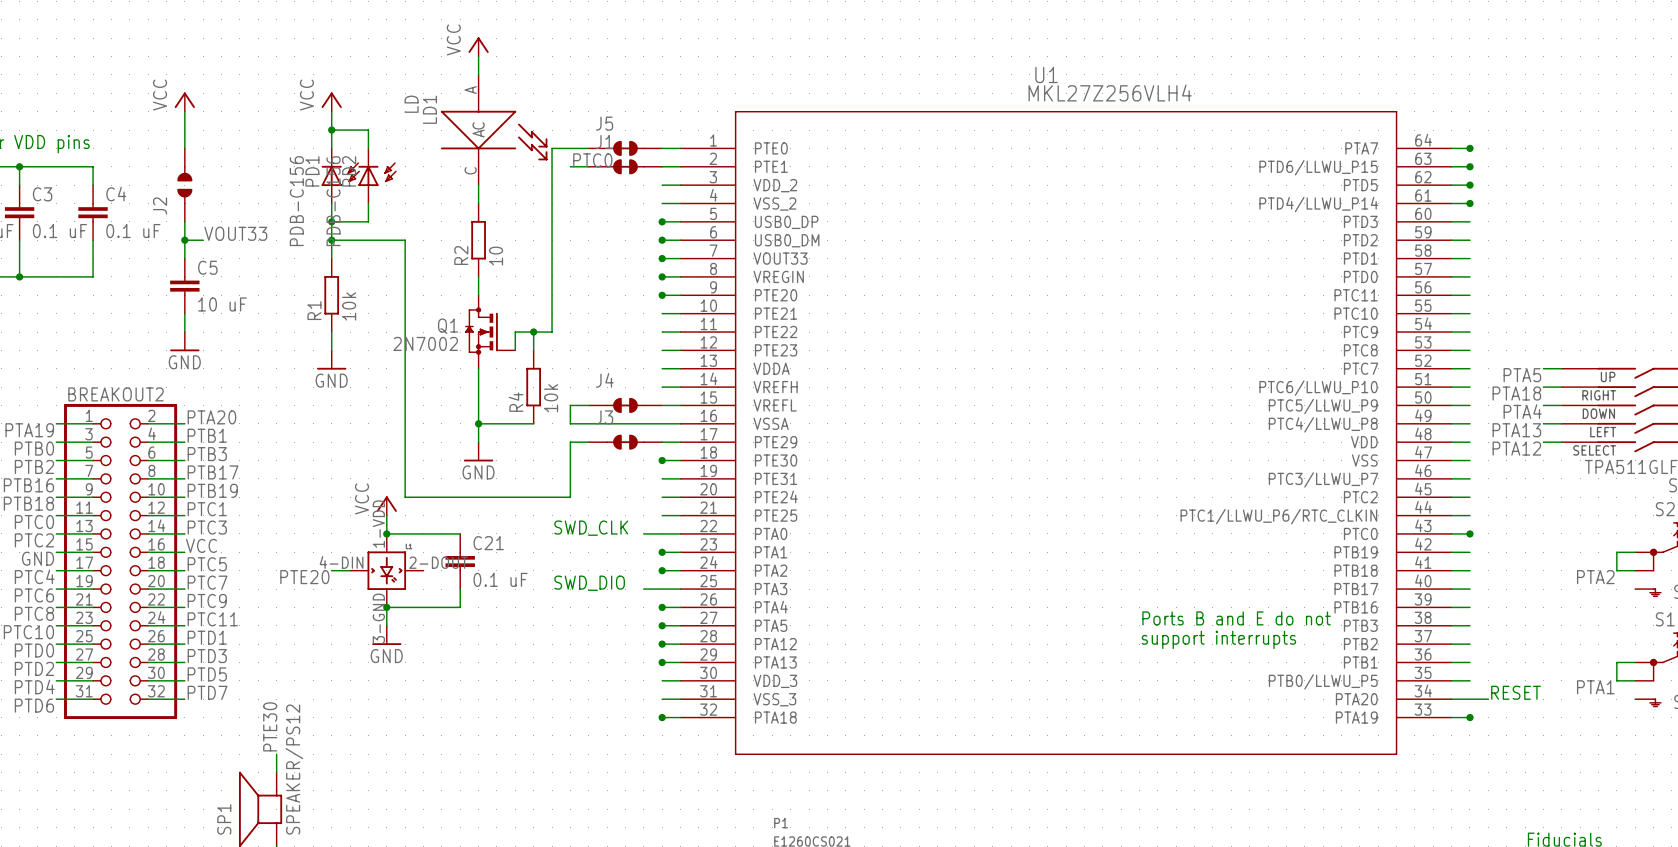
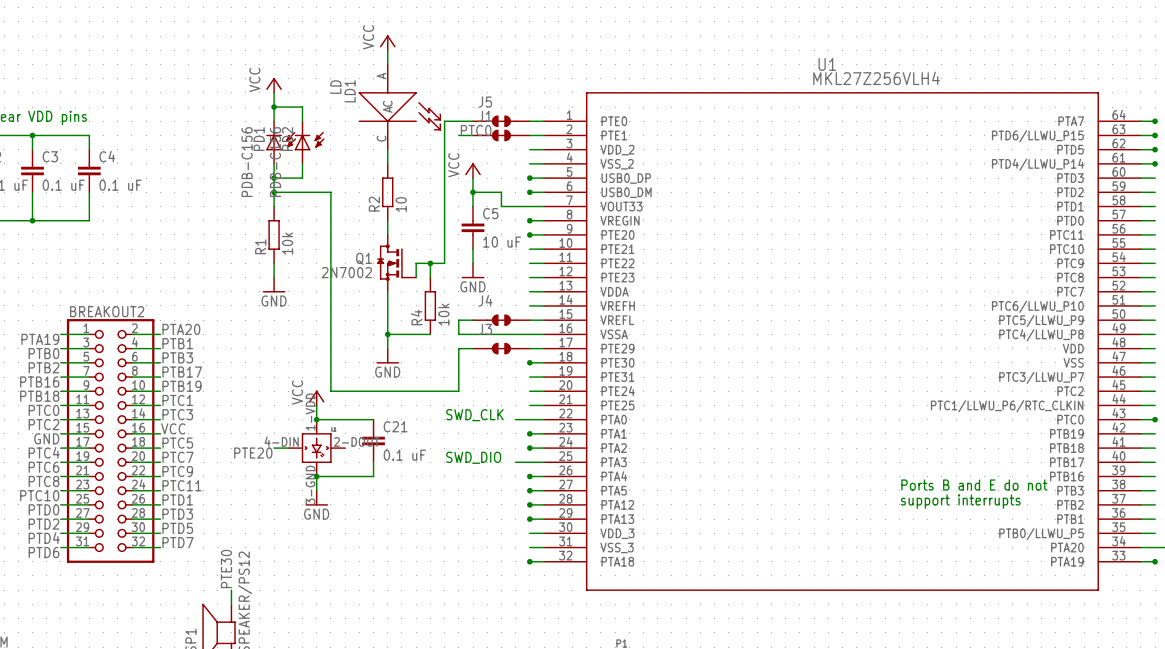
power symbol: VCC (184, 102) -> none
wire: (184, 111) (184, 148) -> none
J2: (184, 185) -> none
power symbol: none -> VCC (473, 170)
wire: (184, 221) (184, 258) -> none
wire: none -> (473, 178) (473, 206)
label: VOUT33 (235, 233) -> none
wire: (184, 240) (203, 240) -> none
junction: (184, 240) -> none
wire: none -> (473, 192) (501, 192) (501, 206) (529, 206)
junction: none -> (473, 192)
junction: (662, 258) -> none
C5 position: (184, 286) -> (473, 227)
wire: (184, 313) (184, 332) -> none
wire: none -> (473, 249) (473, 263)
power symbol: GND (184, 341) -> none
power symbol: none -> GND (473, 270)

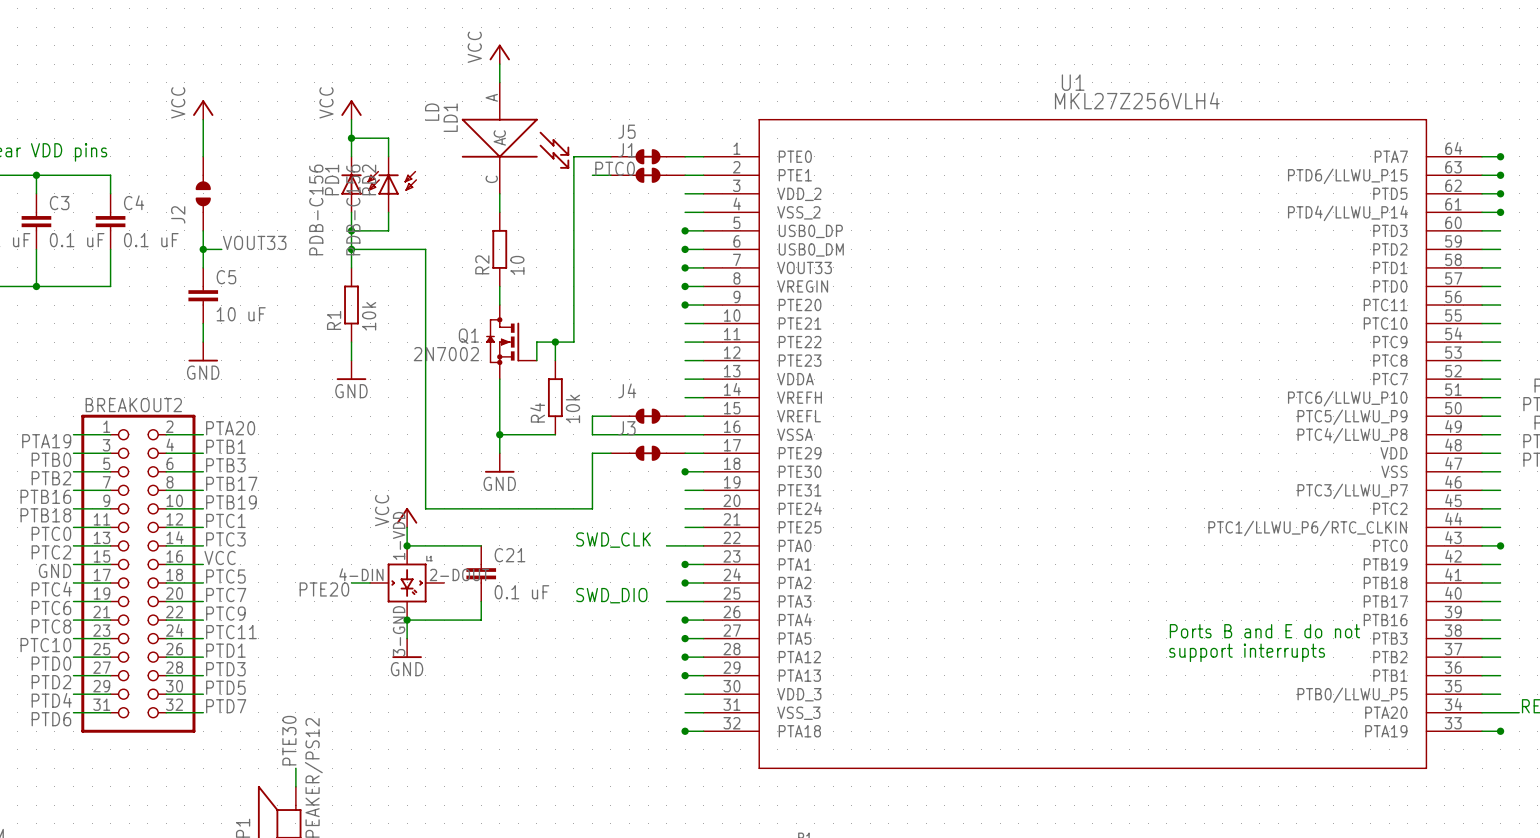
power symbol: none -> VCC (203, 109)
wire: none -> (203, 119) (203, 156)
J2: none -> (203, 193)
power symbol: VCC (473, 170) -> none
wire: none -> (203, 230) (203, 267)
wire: (473, 178) (473, 206) -> none
label: none -> VOUT33 (254, 242)
wire: none -> (203, 249) (221, 249)
junction: none -> (203, 249)
wire: (473, 192) (501, 192) (501, 206) (529, 206) -> none
junction: (473, 192) -> none
junction: none -> (685, 267)
C5 position: (473, 227) -> (203, 295)
wire: none -> (203, 323) (203, 342)
wire: (473, 249) (473, 263) -> none
power symbol: none -> GND (203, 351)
power symbol: GND (473, 270) -> none

